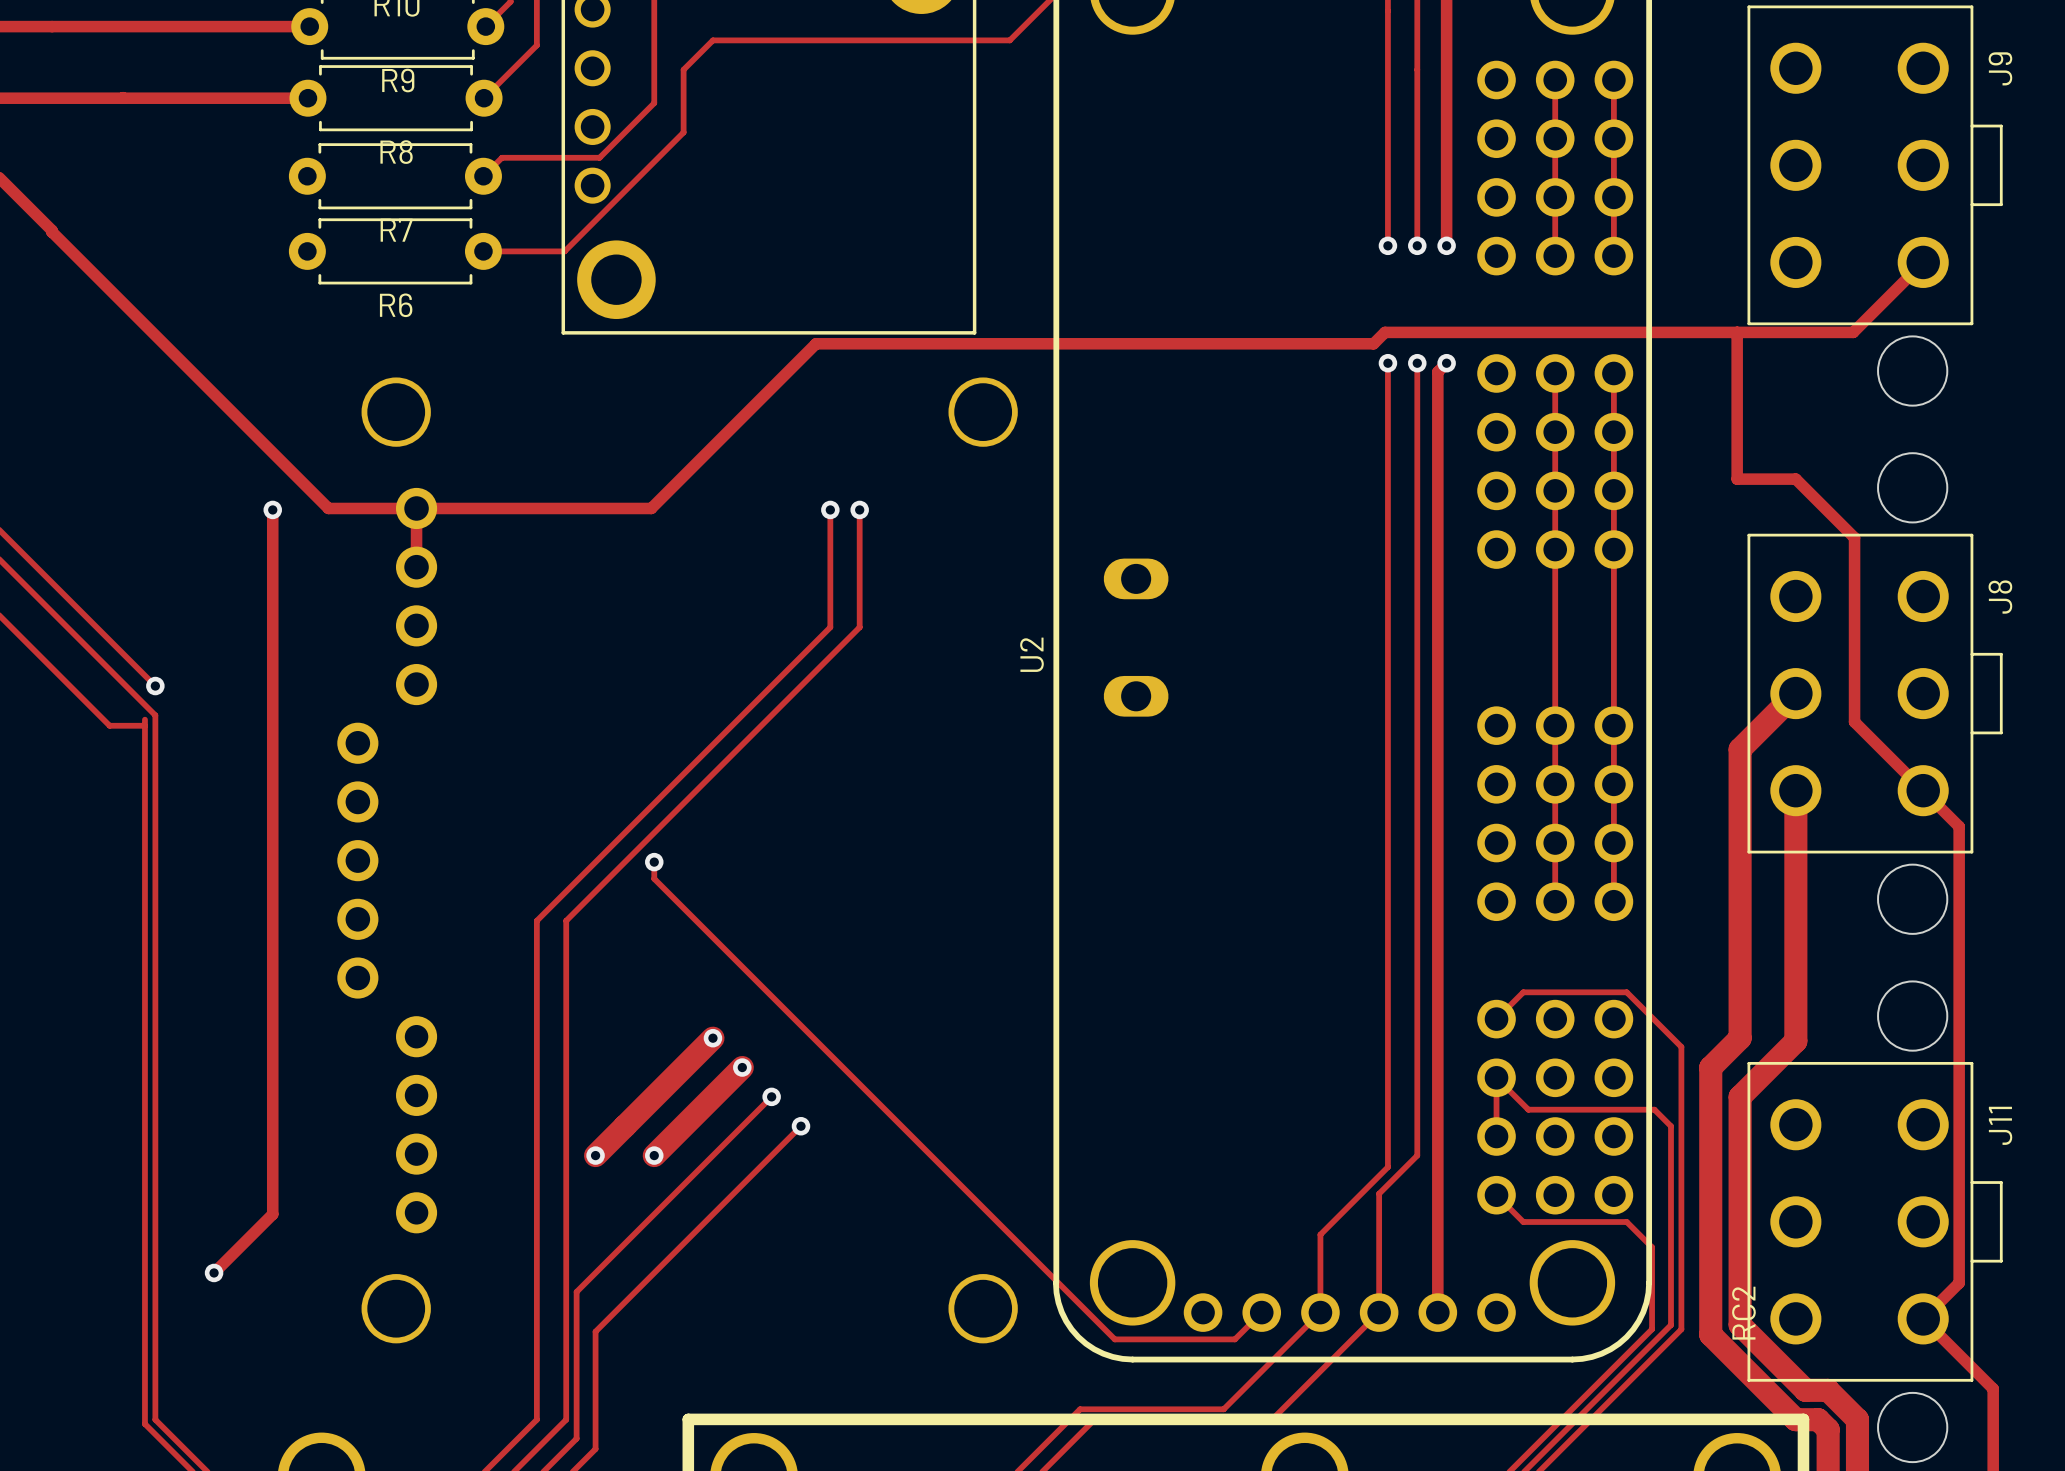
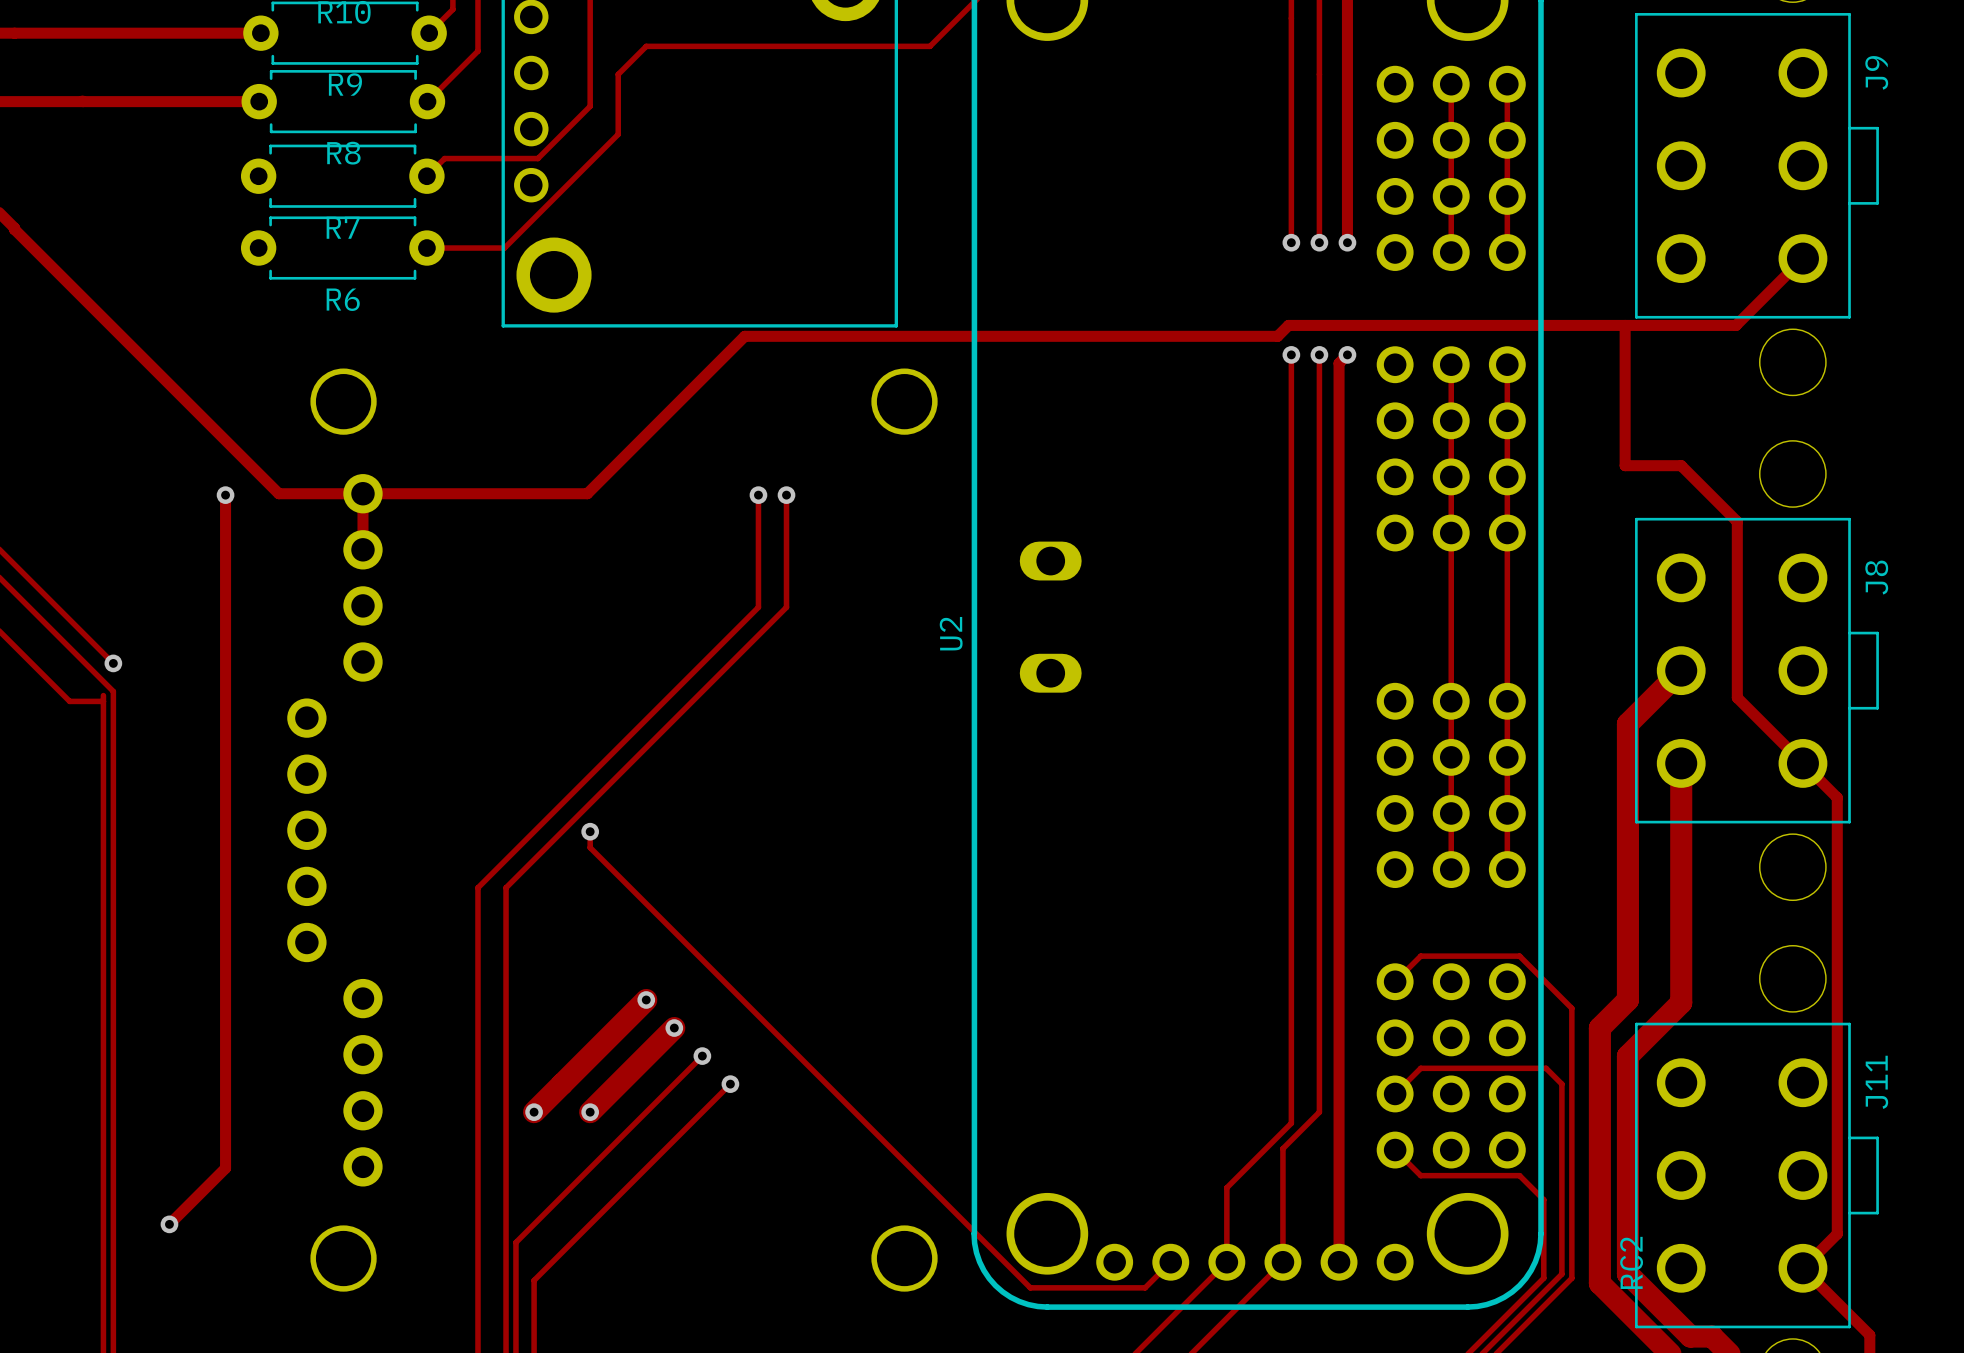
track: (1528, 1109) (1496, 1077) (1496, 1136) -> (1425, 1068) (1420, 1068) (1395, 1093)

